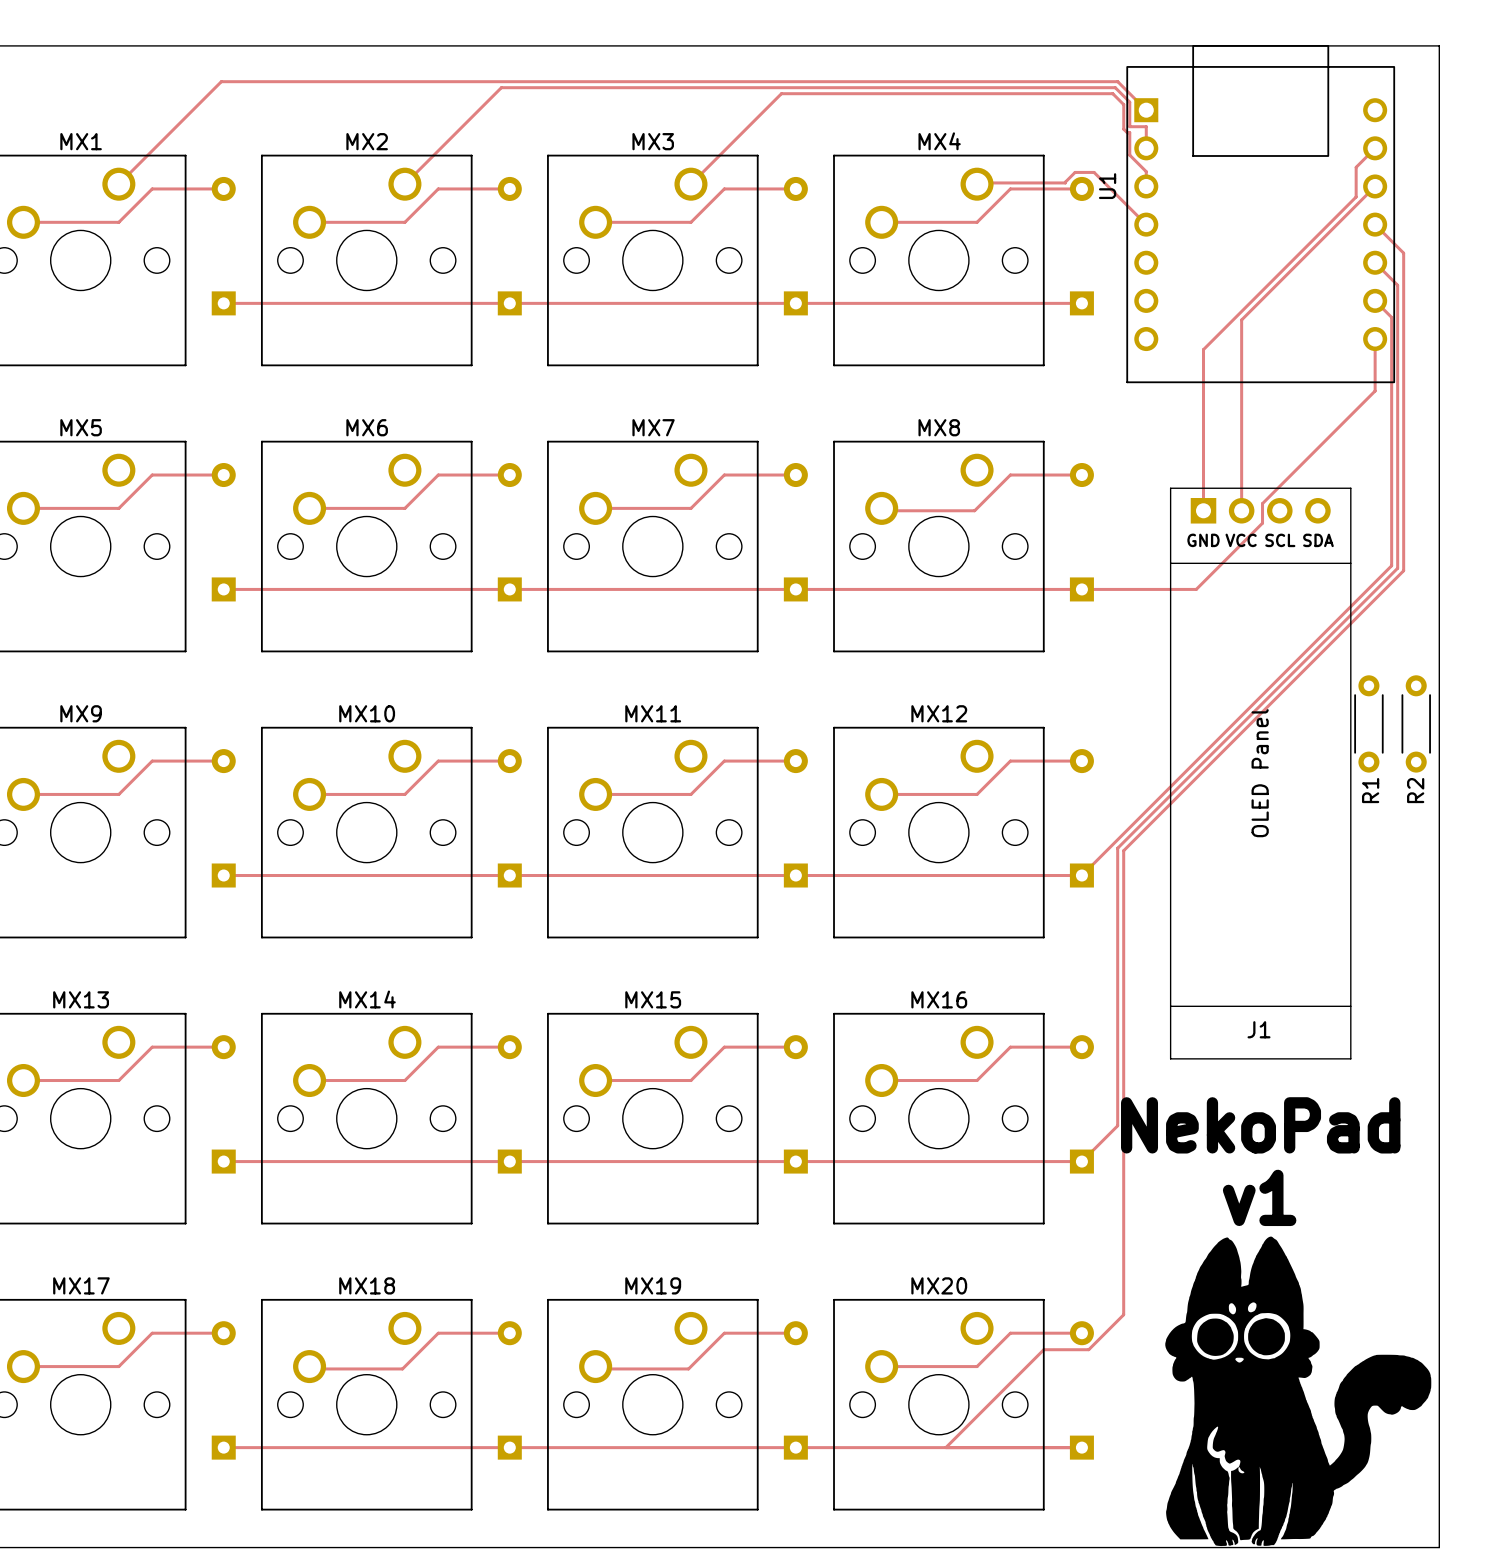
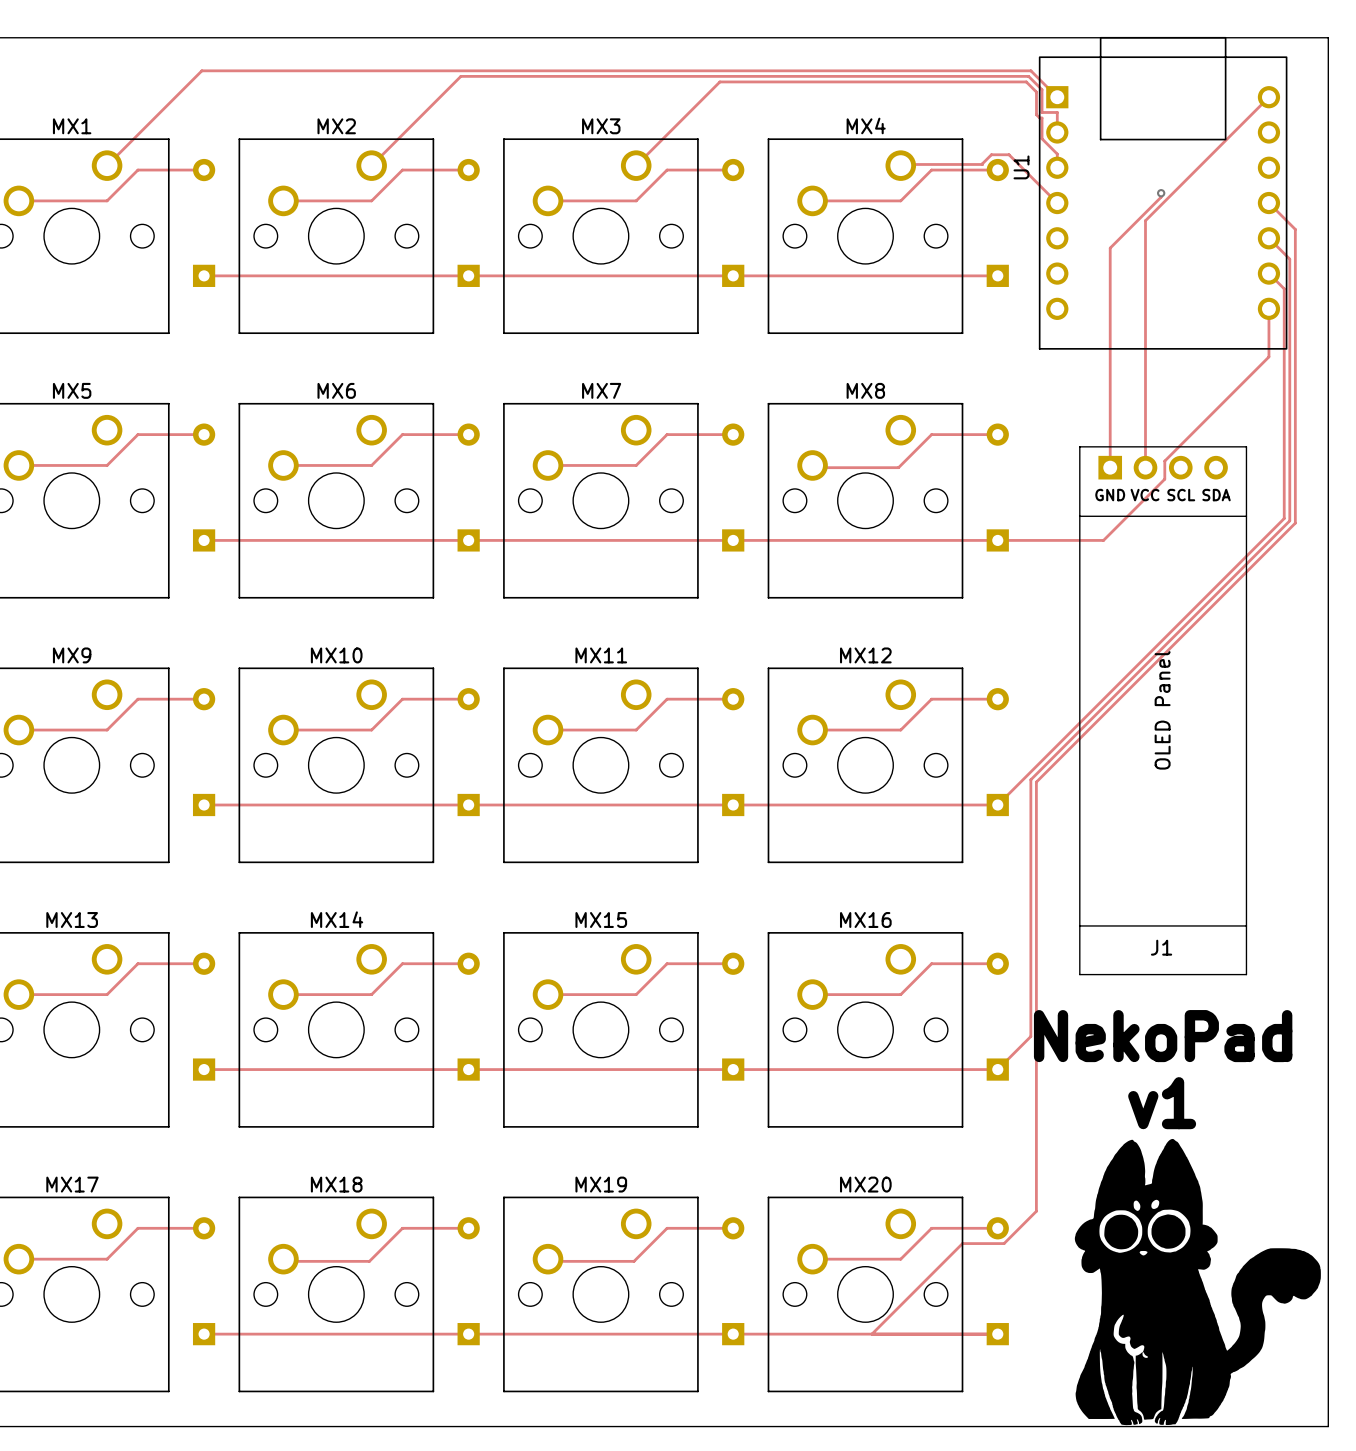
track: (1375, 148) (1356, 167) (1356, 196) (1203, 349) -> (1161, 193) (1161, 197) (1110, 248) (1110, 318)
track: (1375, 186) (1241, 319) -> (1268, 97) (1145, 220) (1145, 291)
via: none -> (1161, 193)
R1: (1368, 723) -> none
R2: (1416, 723) -> none

